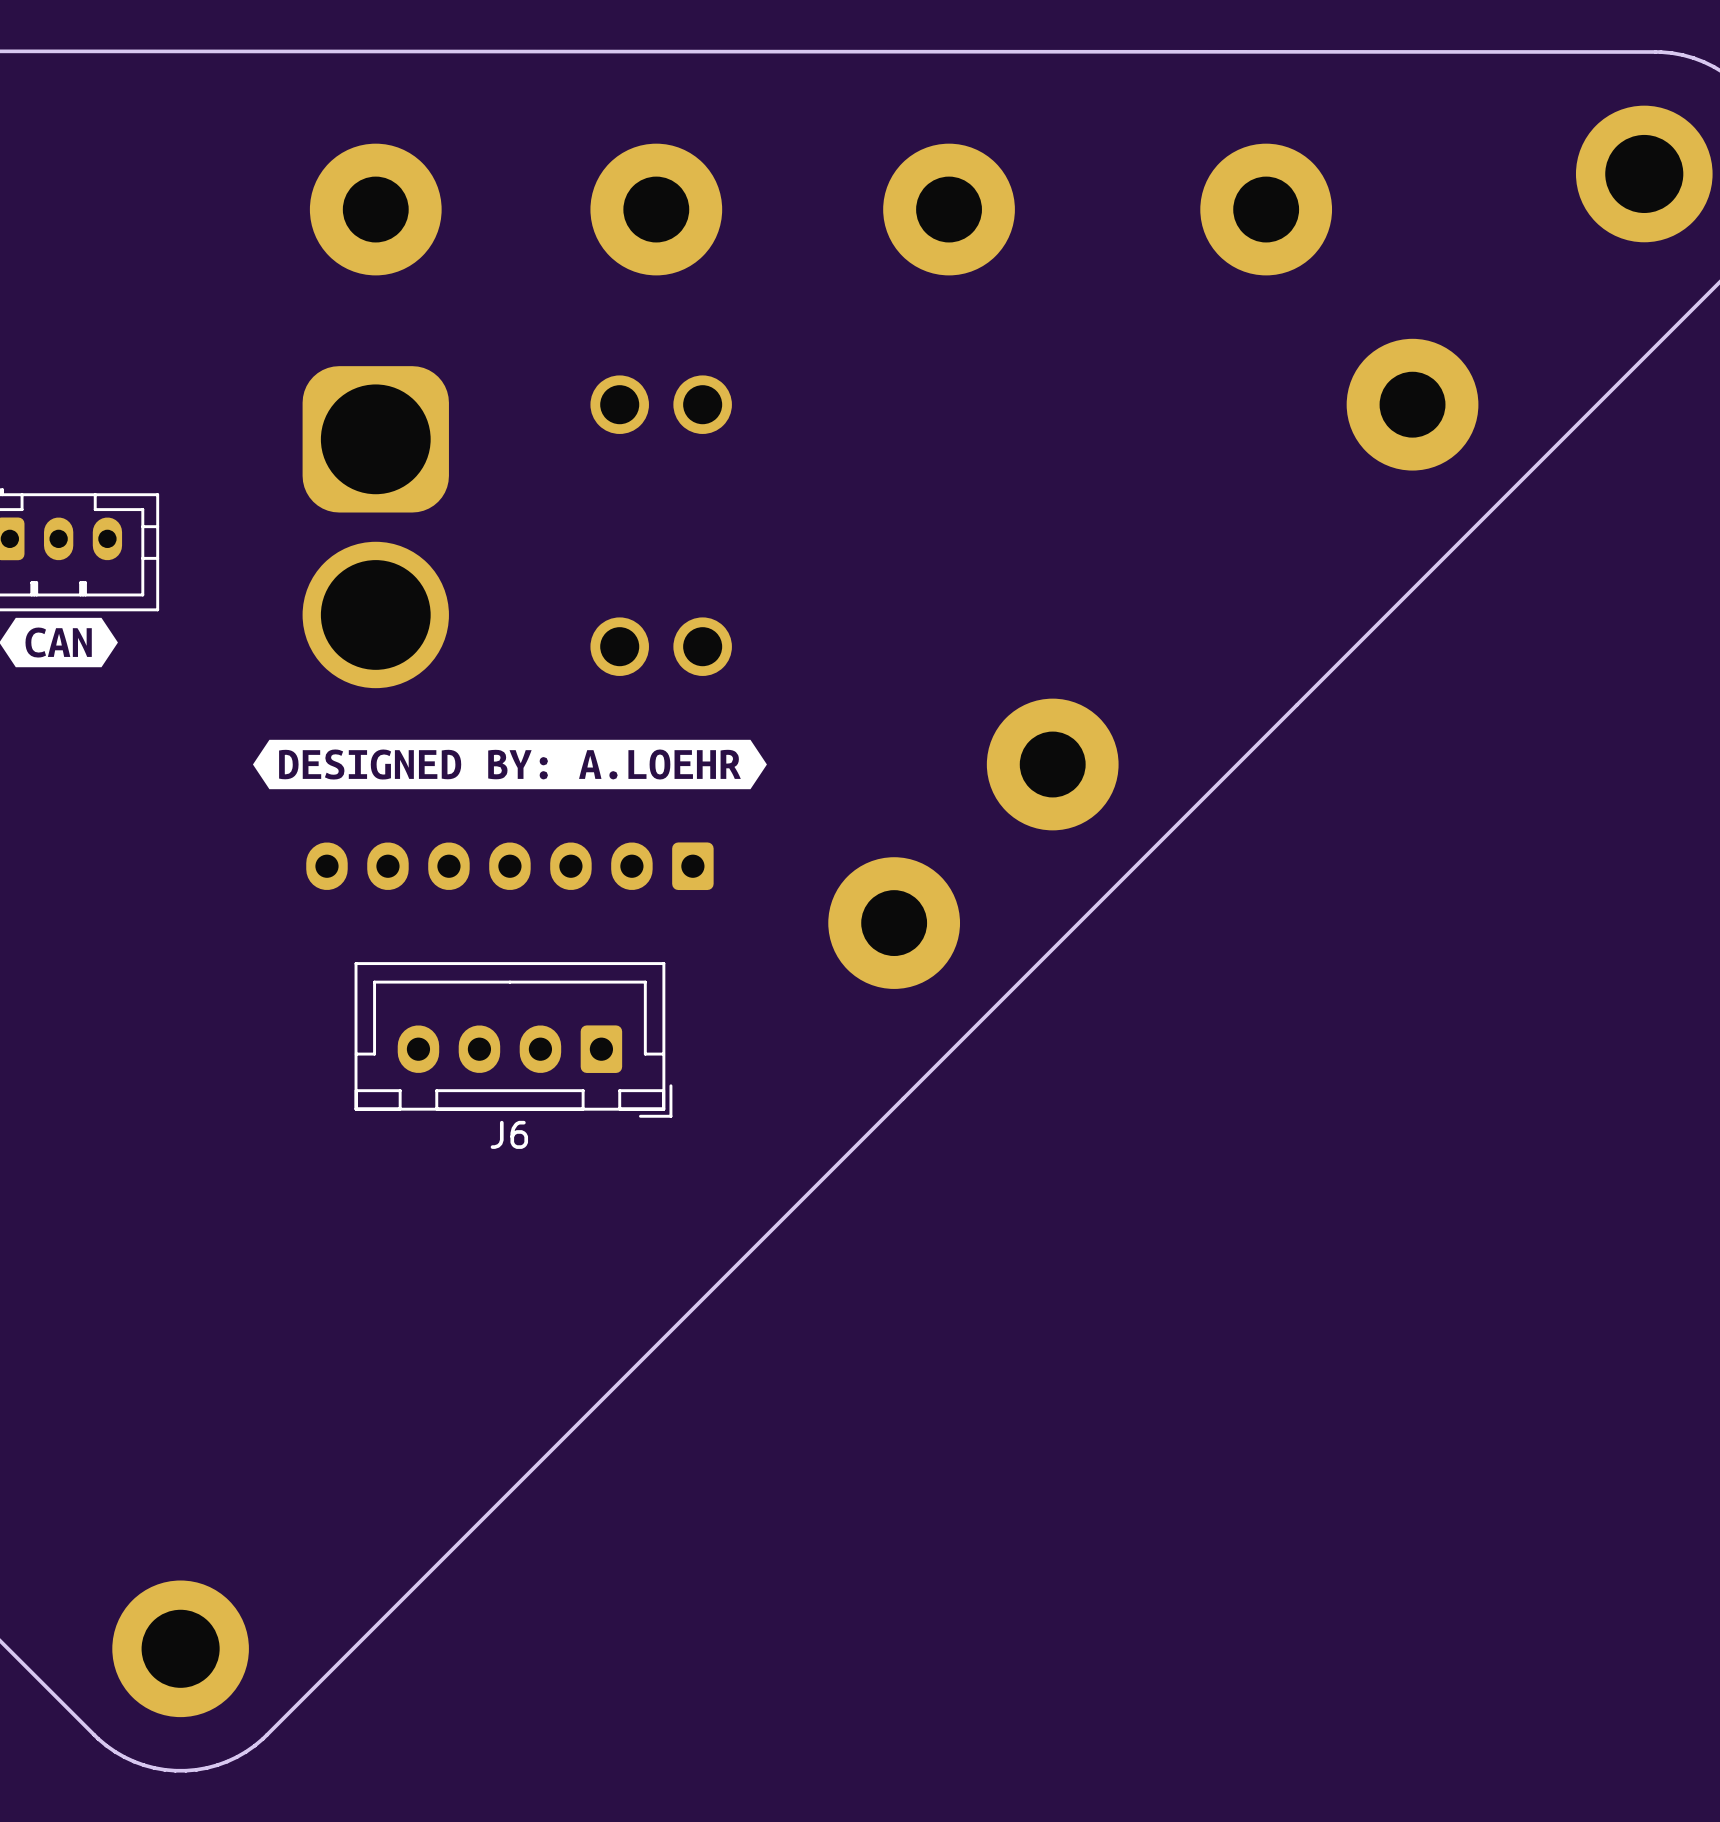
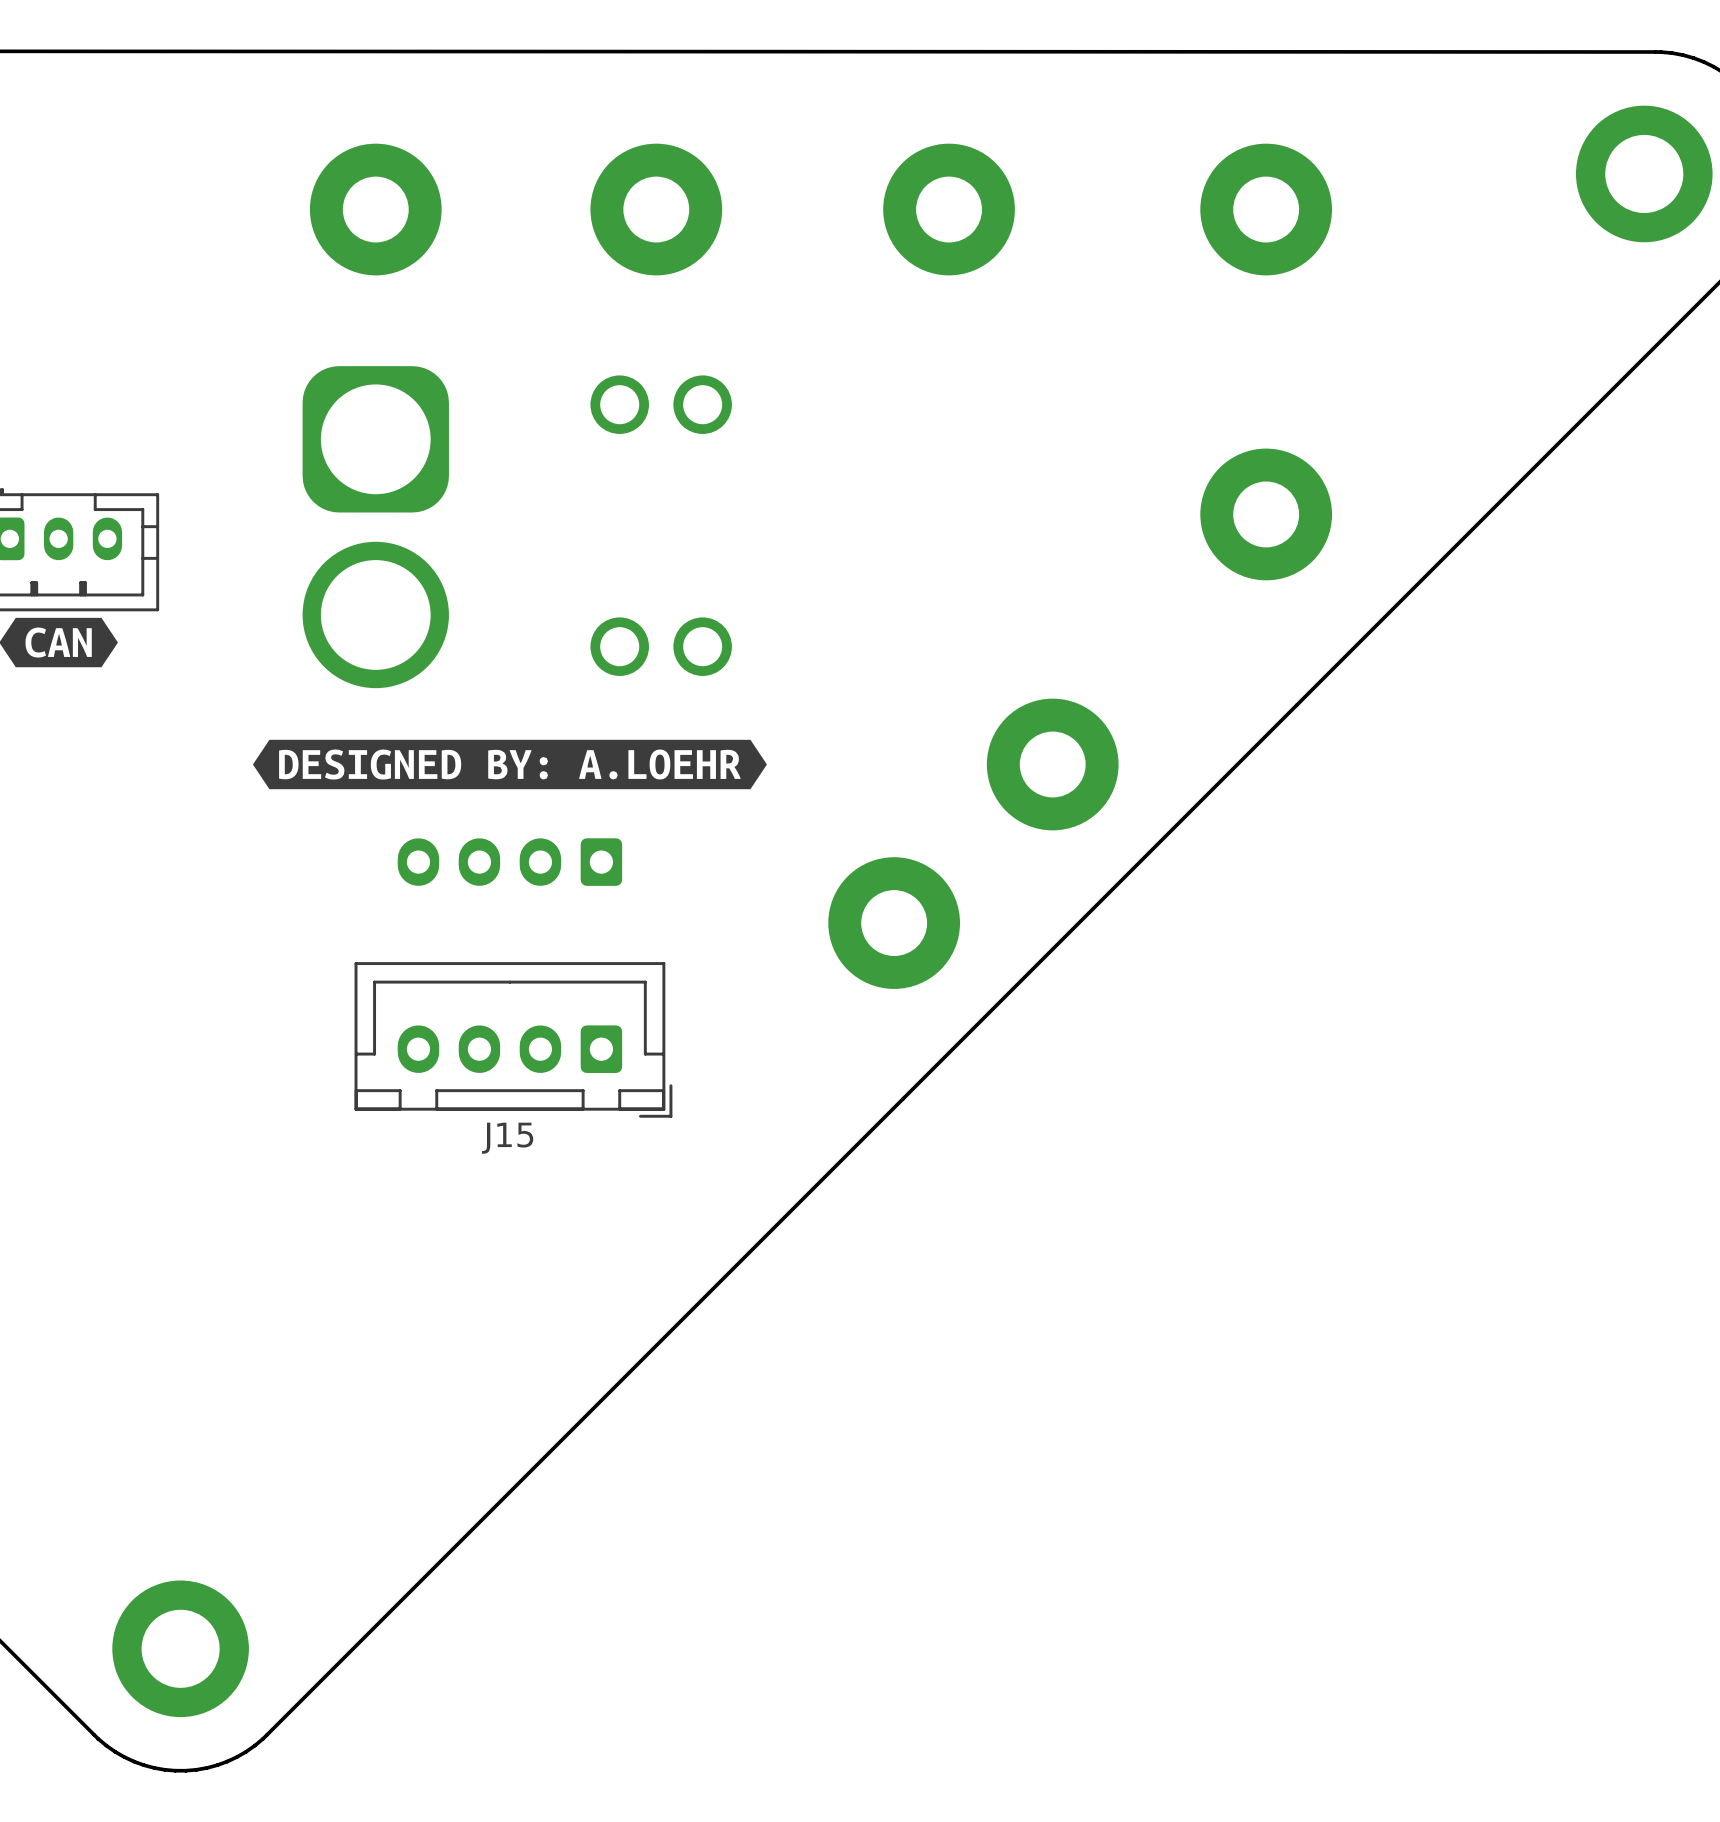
part position: (1412, 404) -> (1266, 514)
part footprint: [306, 842, 714, 891] -> [397, 838, 623, 886]
J6 name: J6 (509, 1134) -> J15 (507, 1138)

